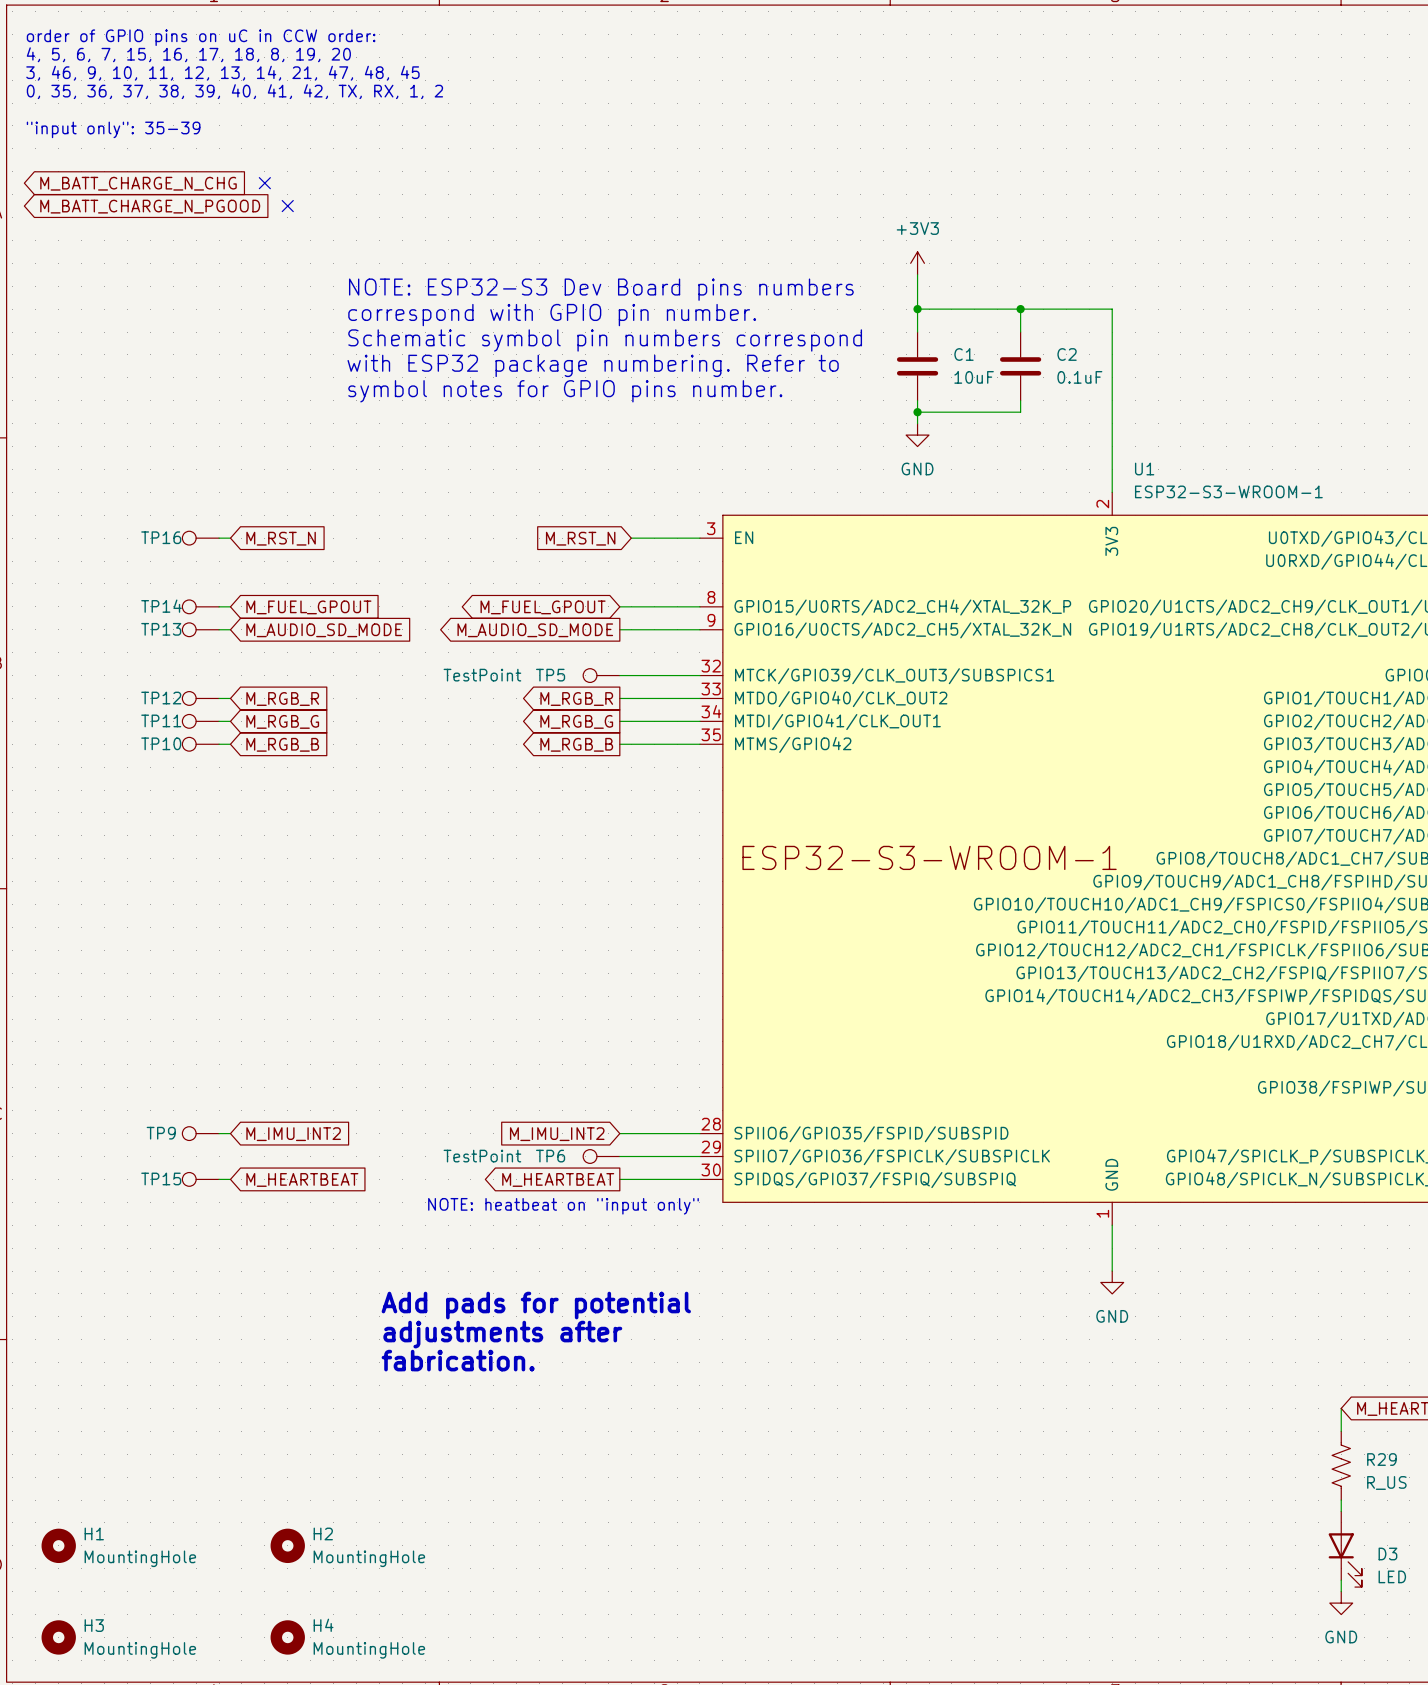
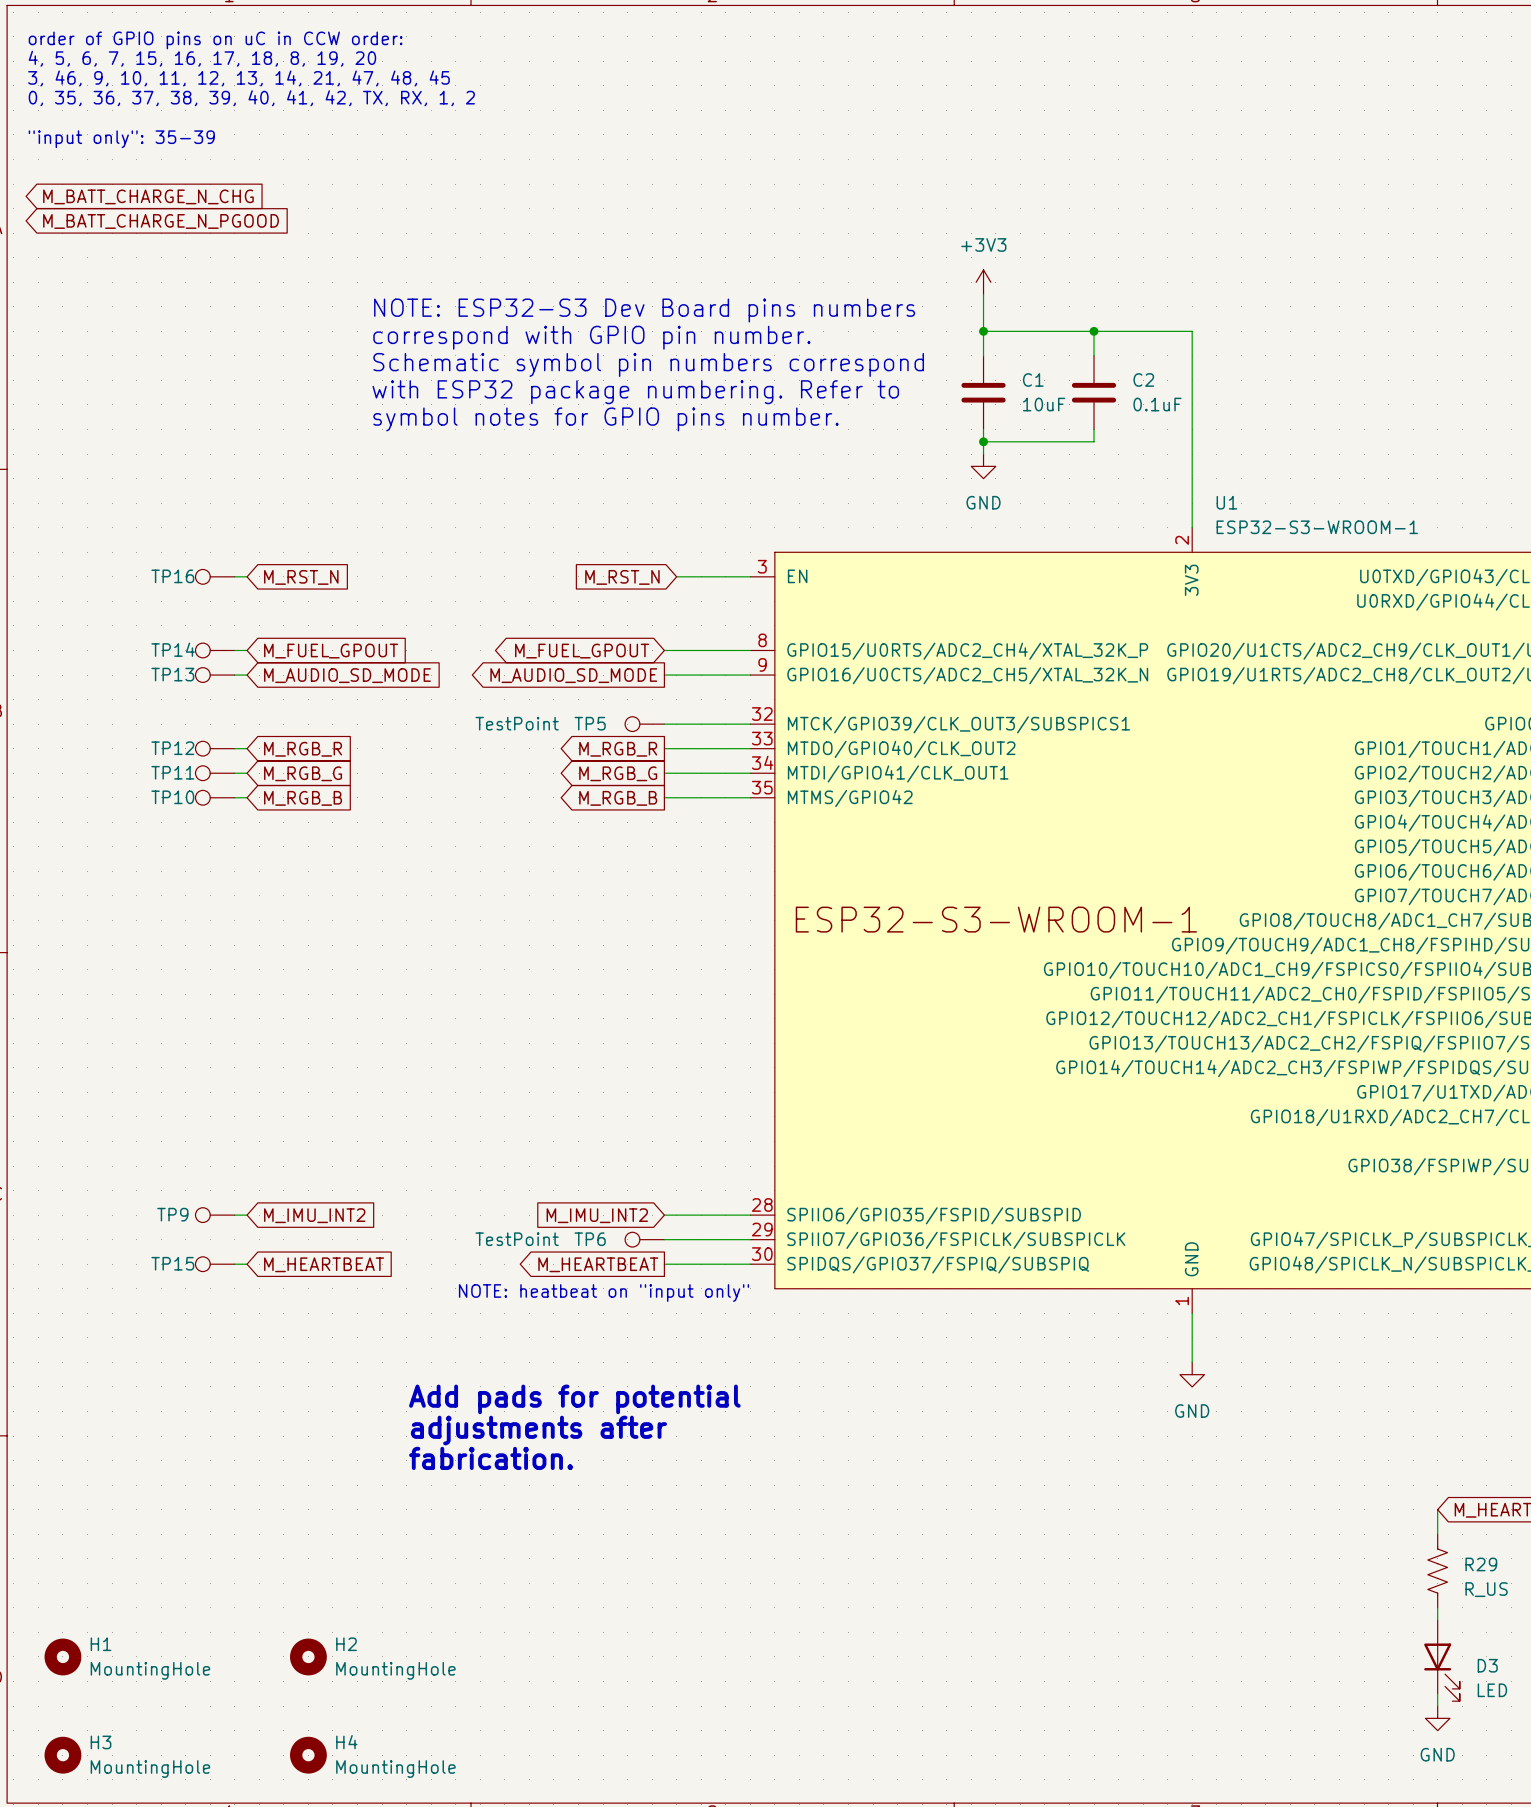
no-connect mark: (264, 183) -> none
no-connect mark: (287, 206) -> none

